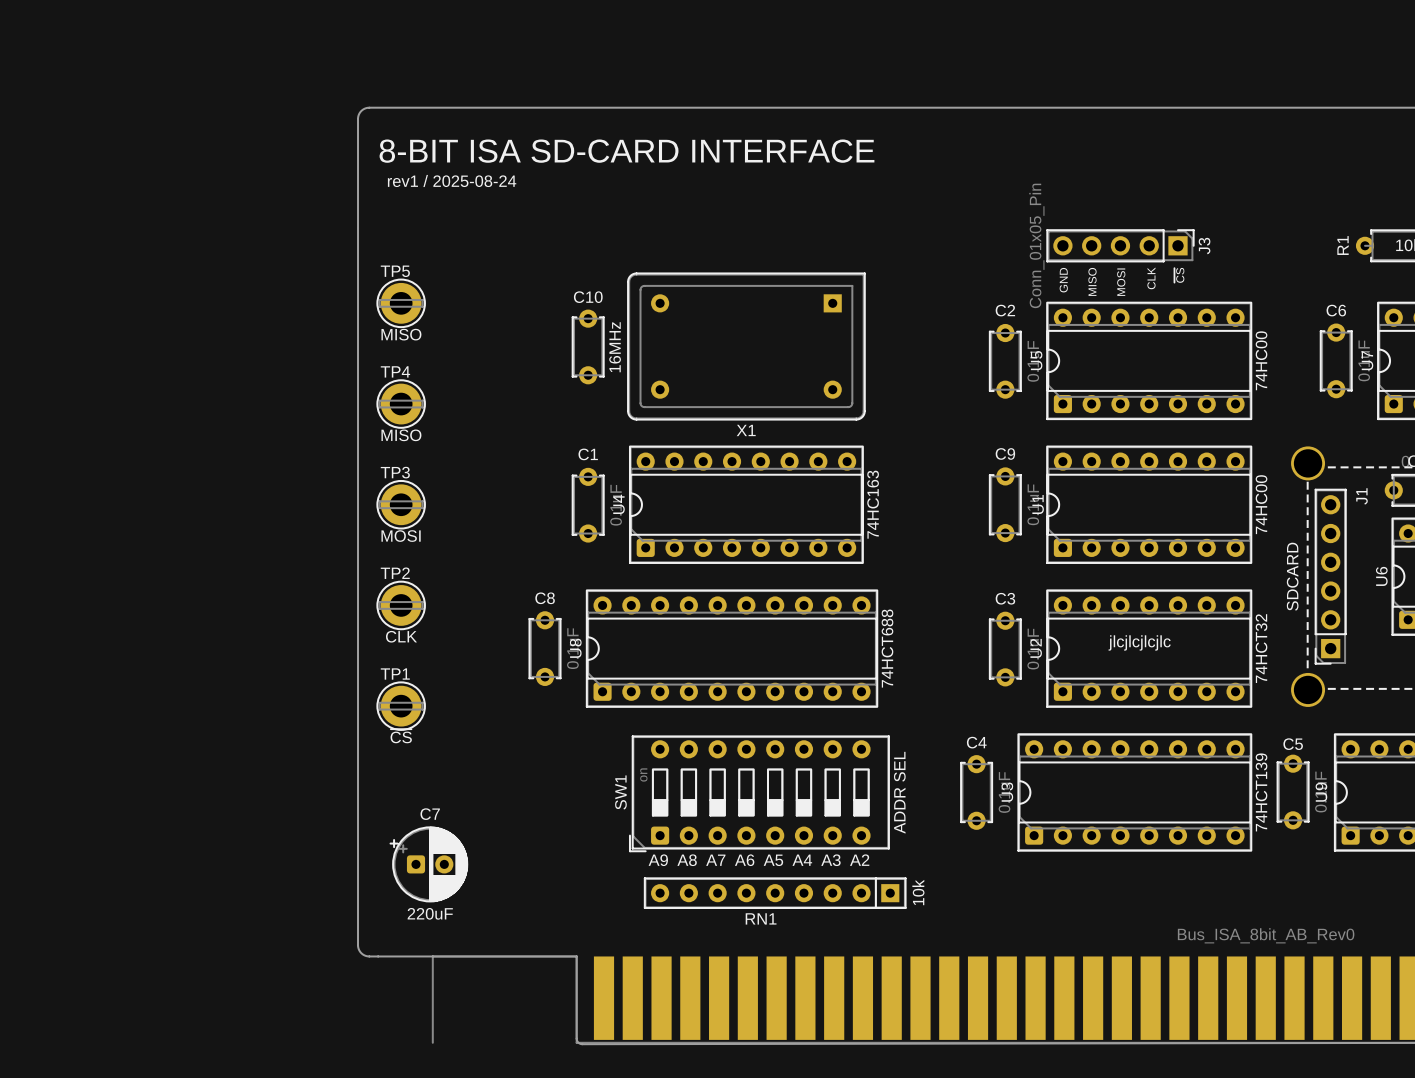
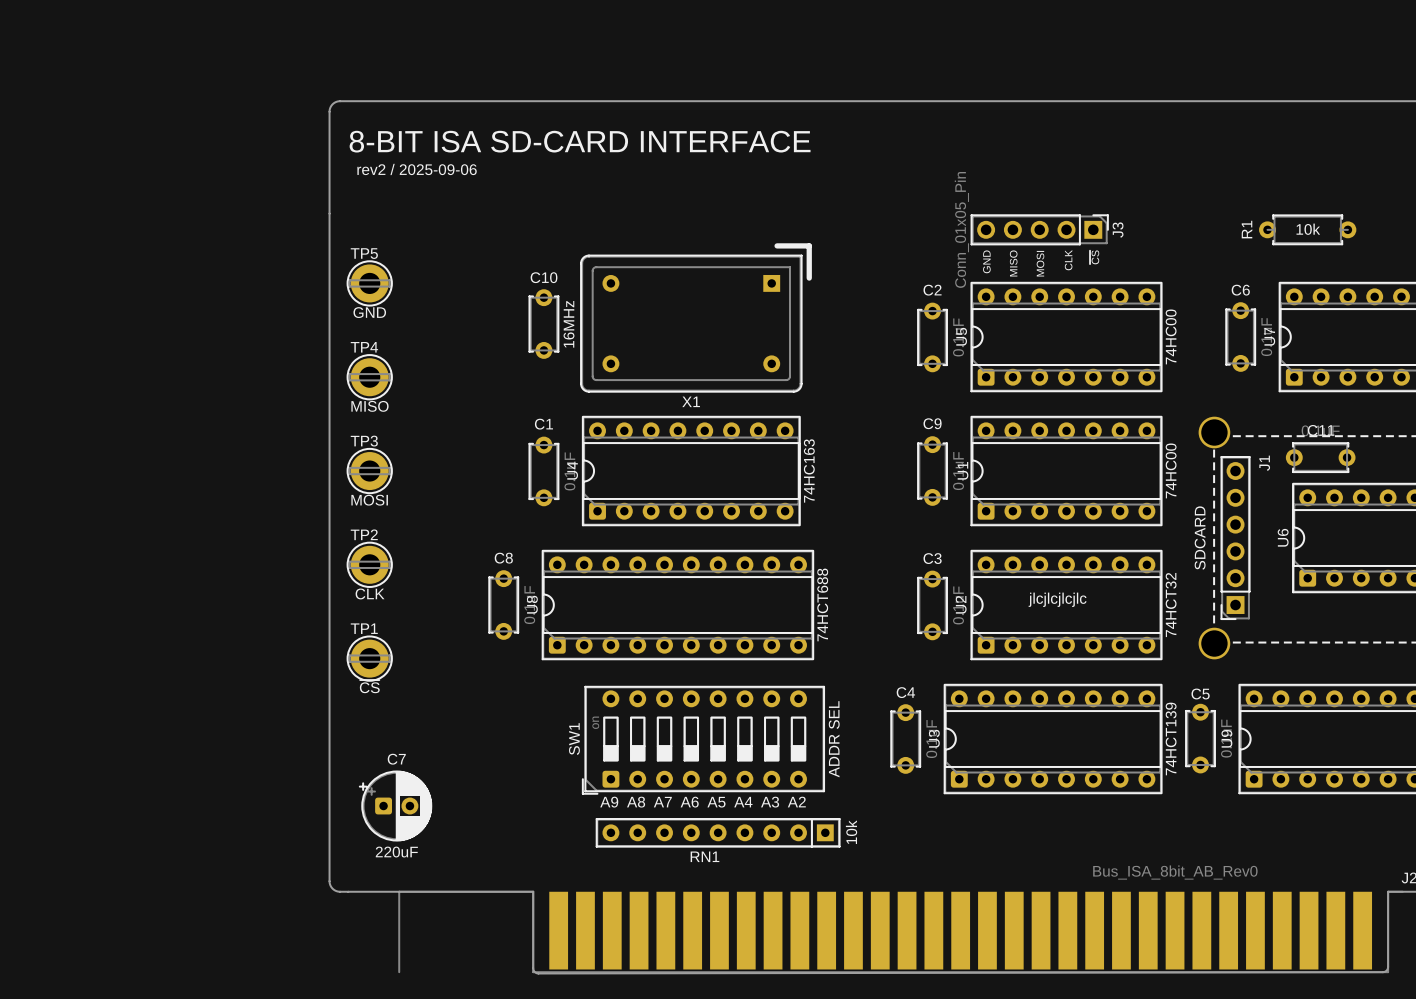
text: rev1 / 2025-08-24 (452, 180) -> rev2 / 2025-09-06 (417, 169)
line: none -> (777, 245) (809, 245) (809, 278)
TP5 value: MISO (401, 334) -> GND (369, 312)

